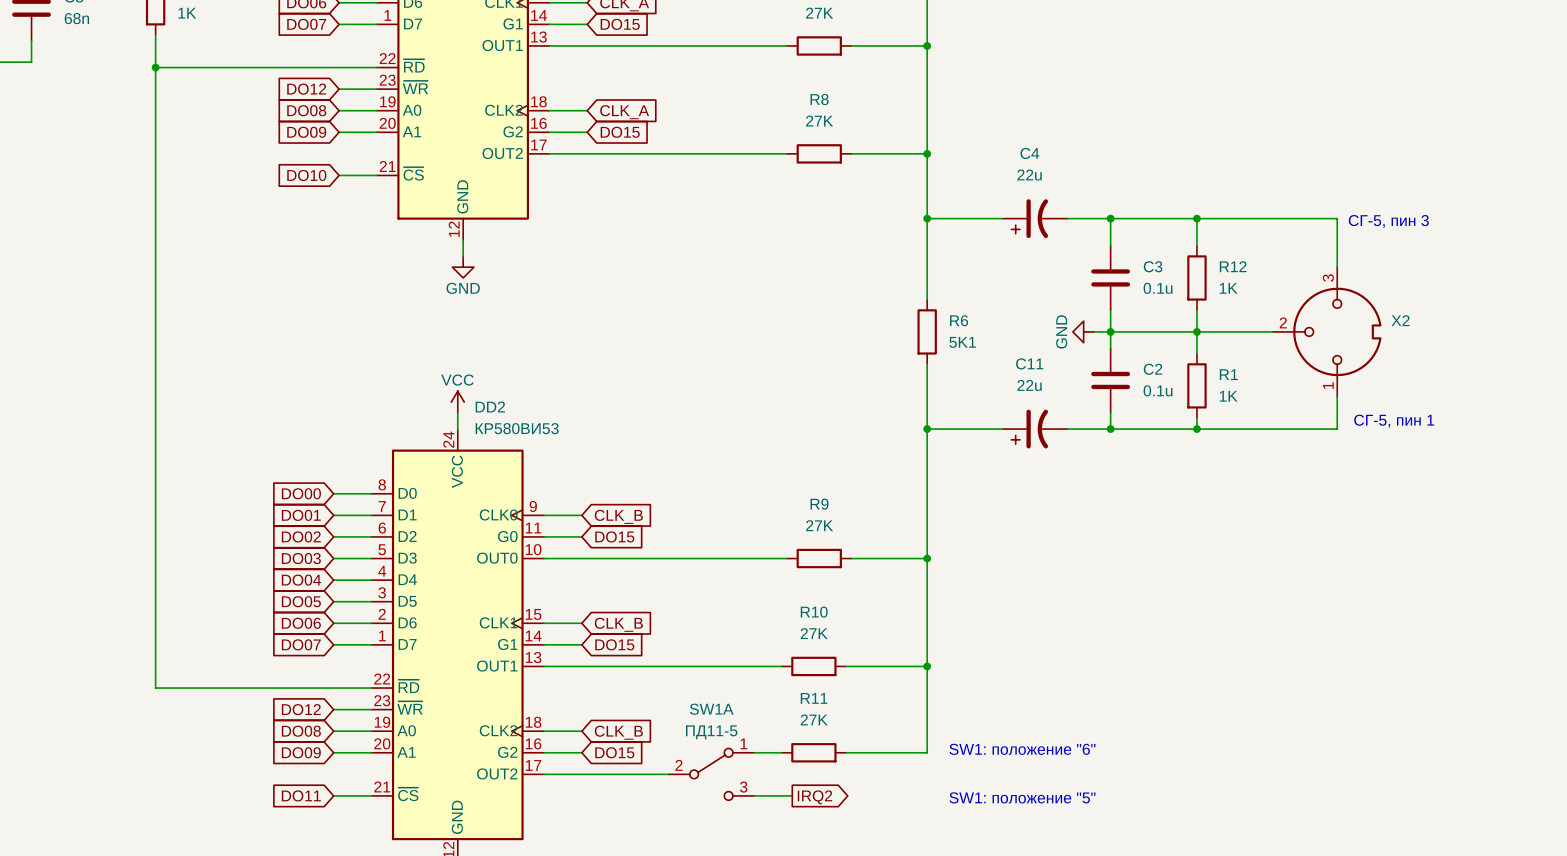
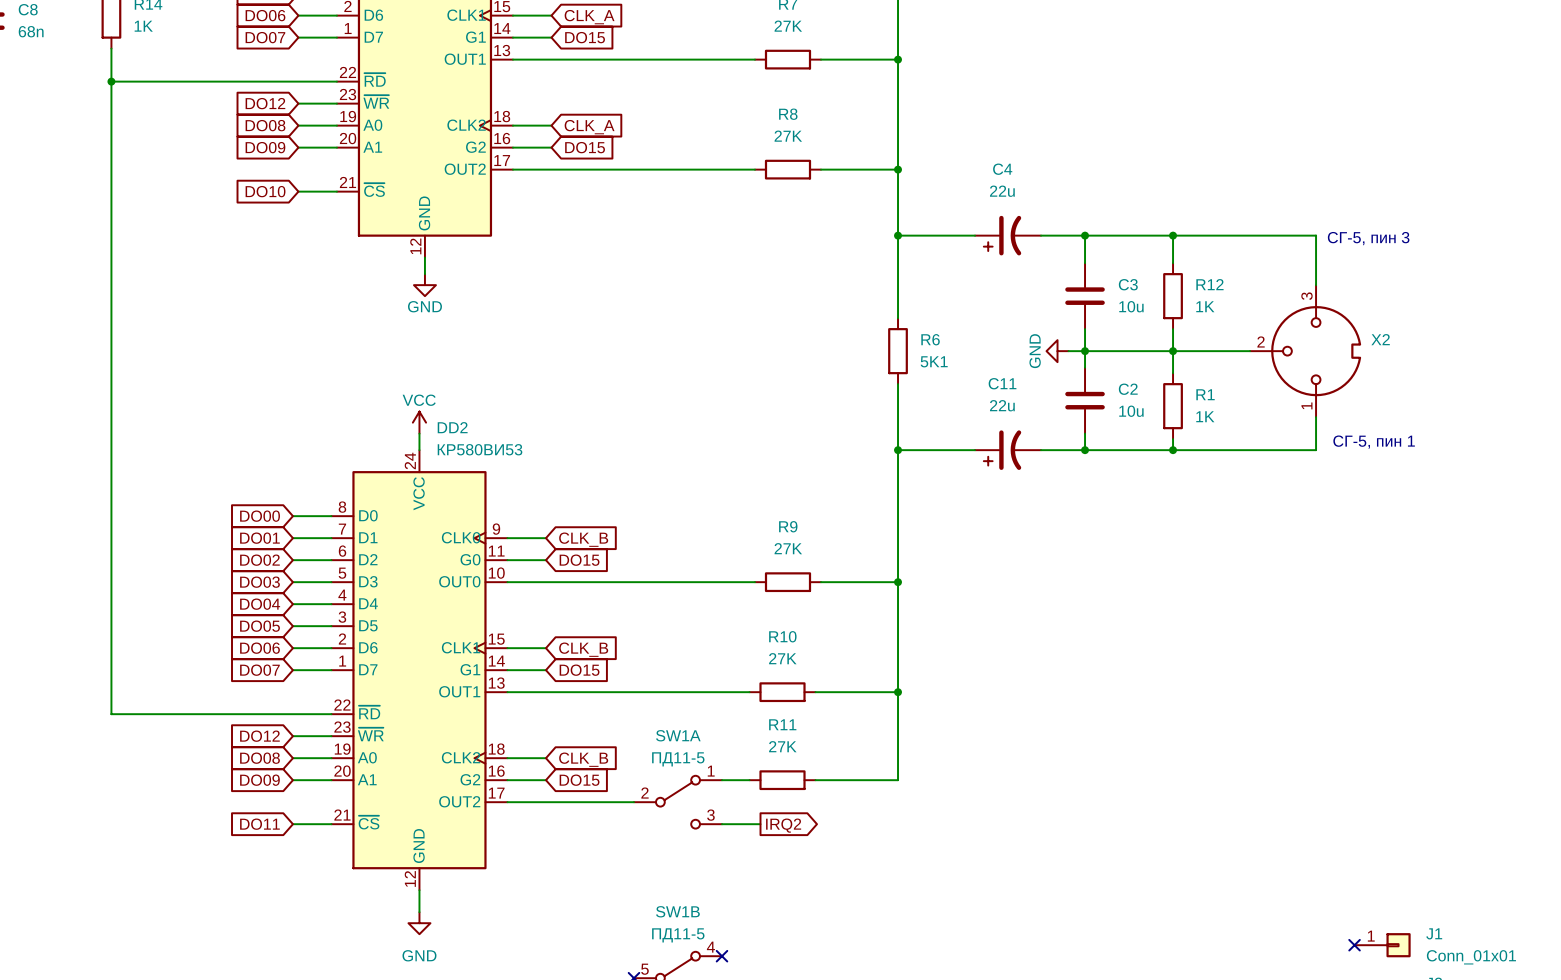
C3 value: 0.1u (1158, 288) -> 10u (1131, 306)
C2 value: 0.1u (1158, 390) -> 10u (1131, 411)
text: SW1: положение "6" (1022, 749) -> none
text: SW1: положение "5" (1022, 797) -> none

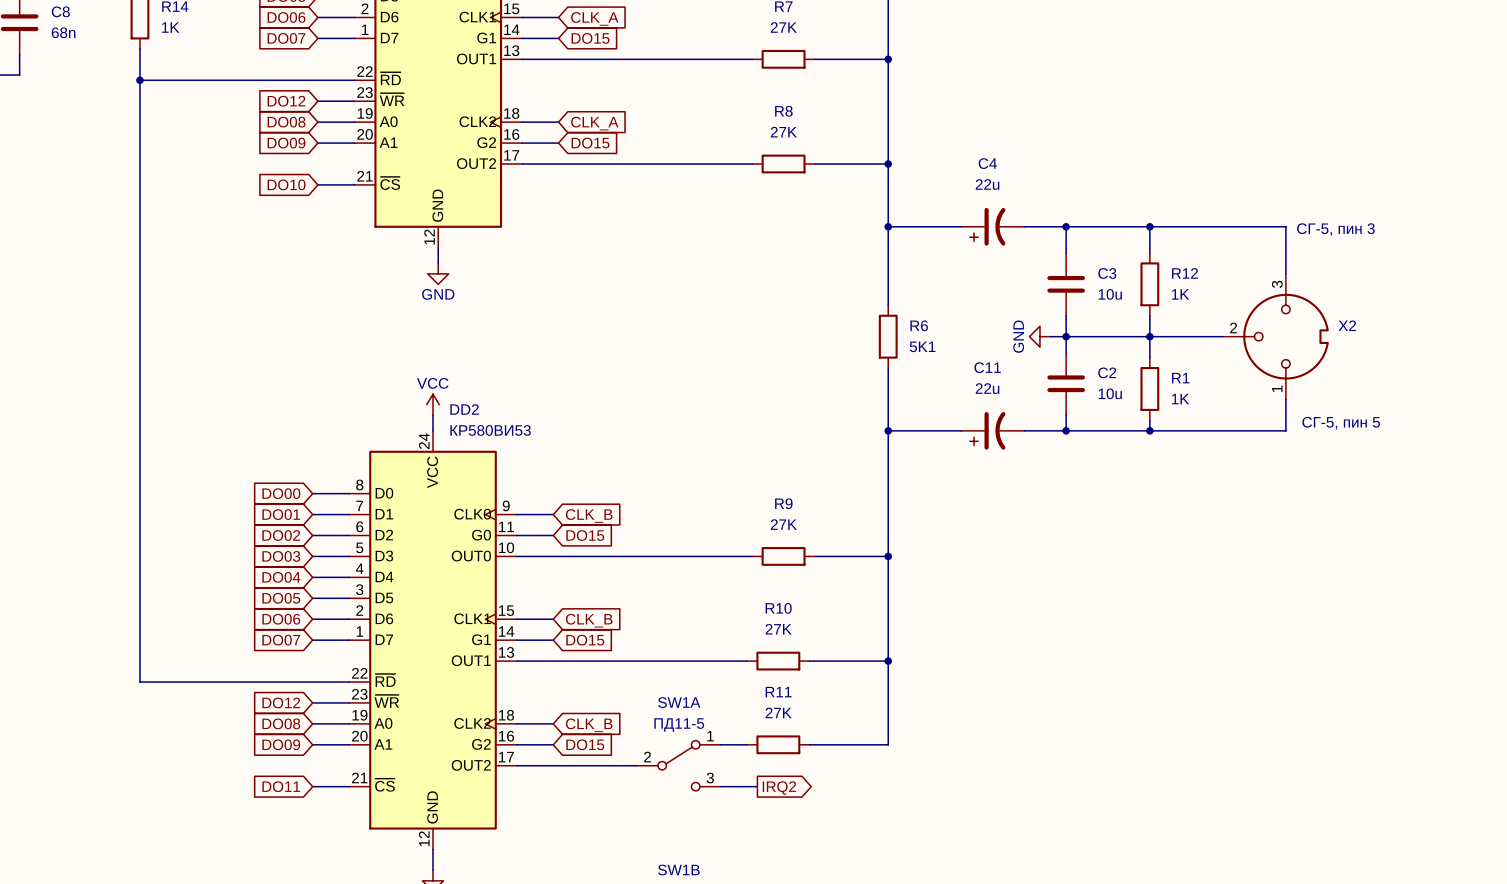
text: СГ-5, пин 1 (1374, 442) -> СГ-5, пин 5 (1341, 423)

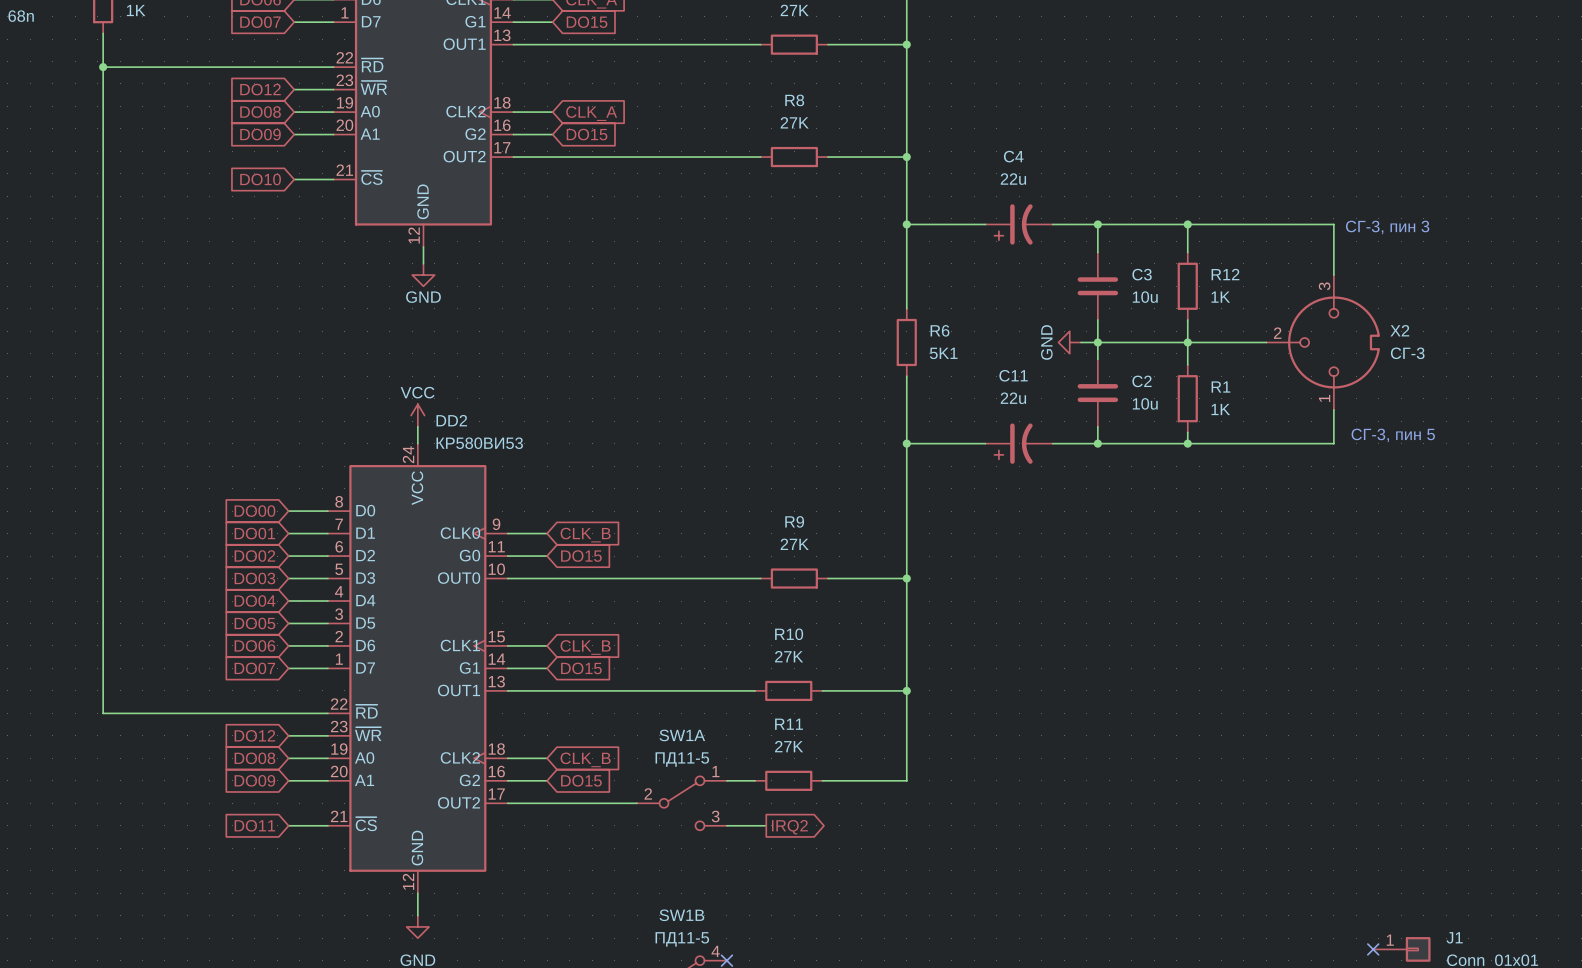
text: СГ-5, пин 3 (1335, 229) -> СГ-3, пин 3 (1387, 227)
X2 value: none -> СГ-3 (1407, 353)
text: СГ-5, пин 5 (1341, 423) -> СГ-3, пин 5 (1393, 435)

